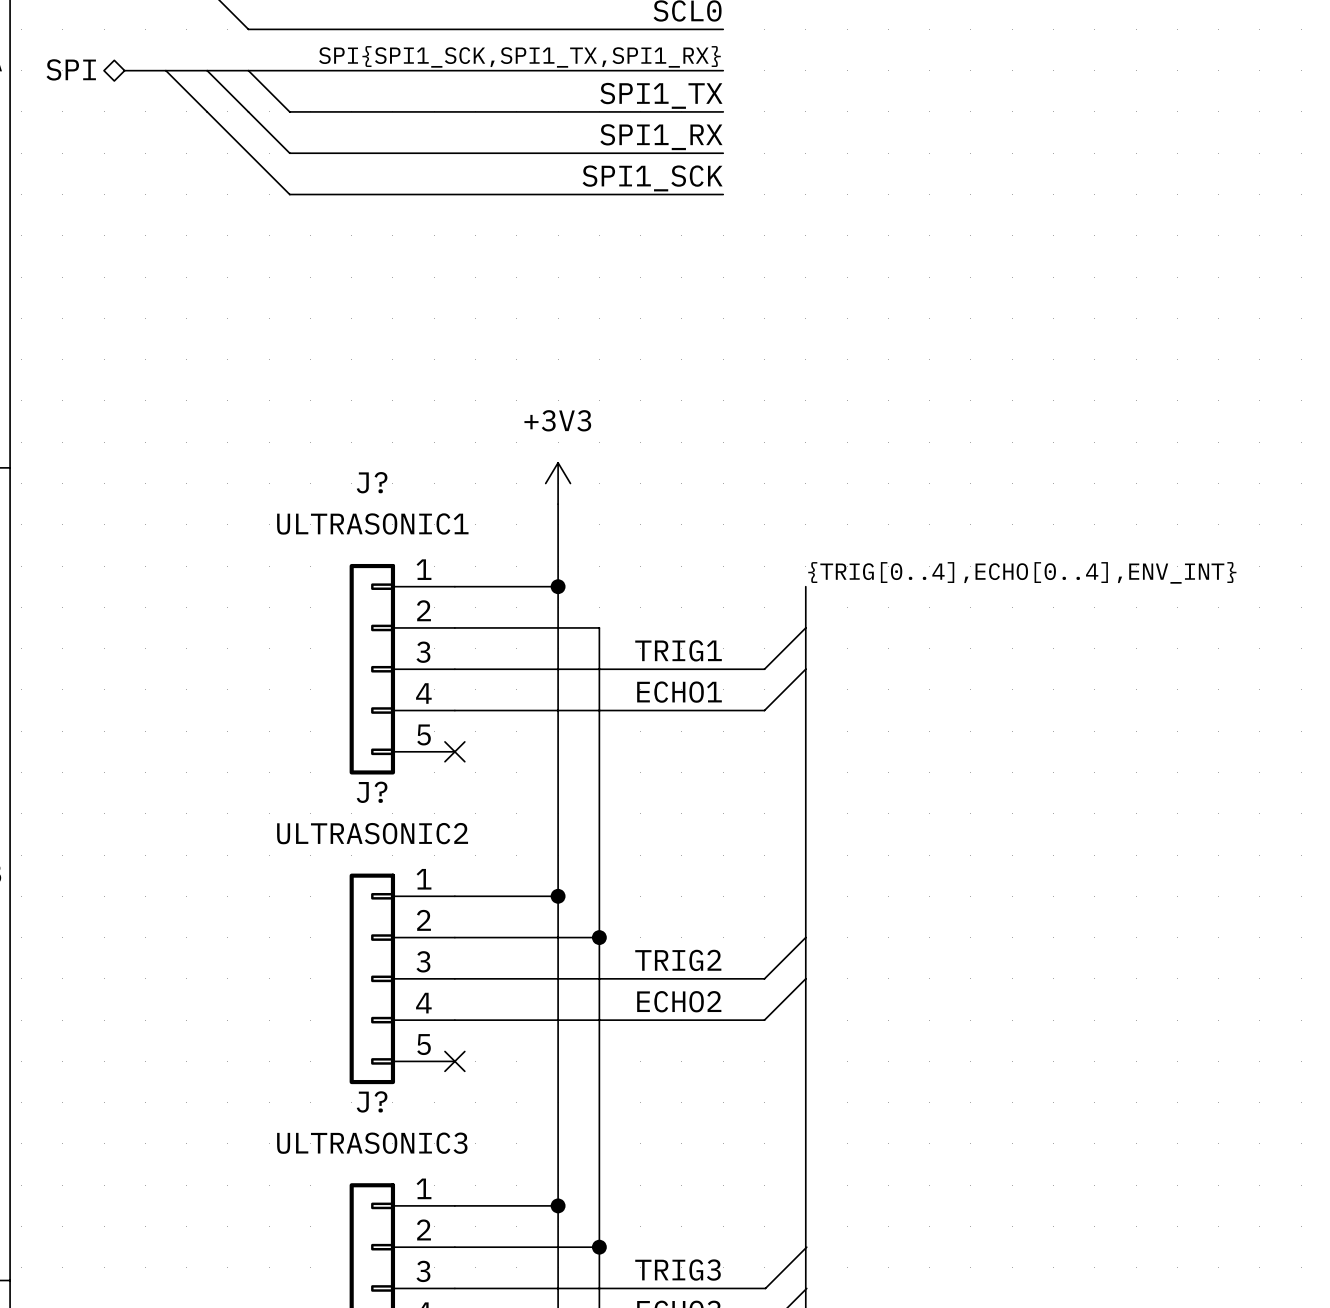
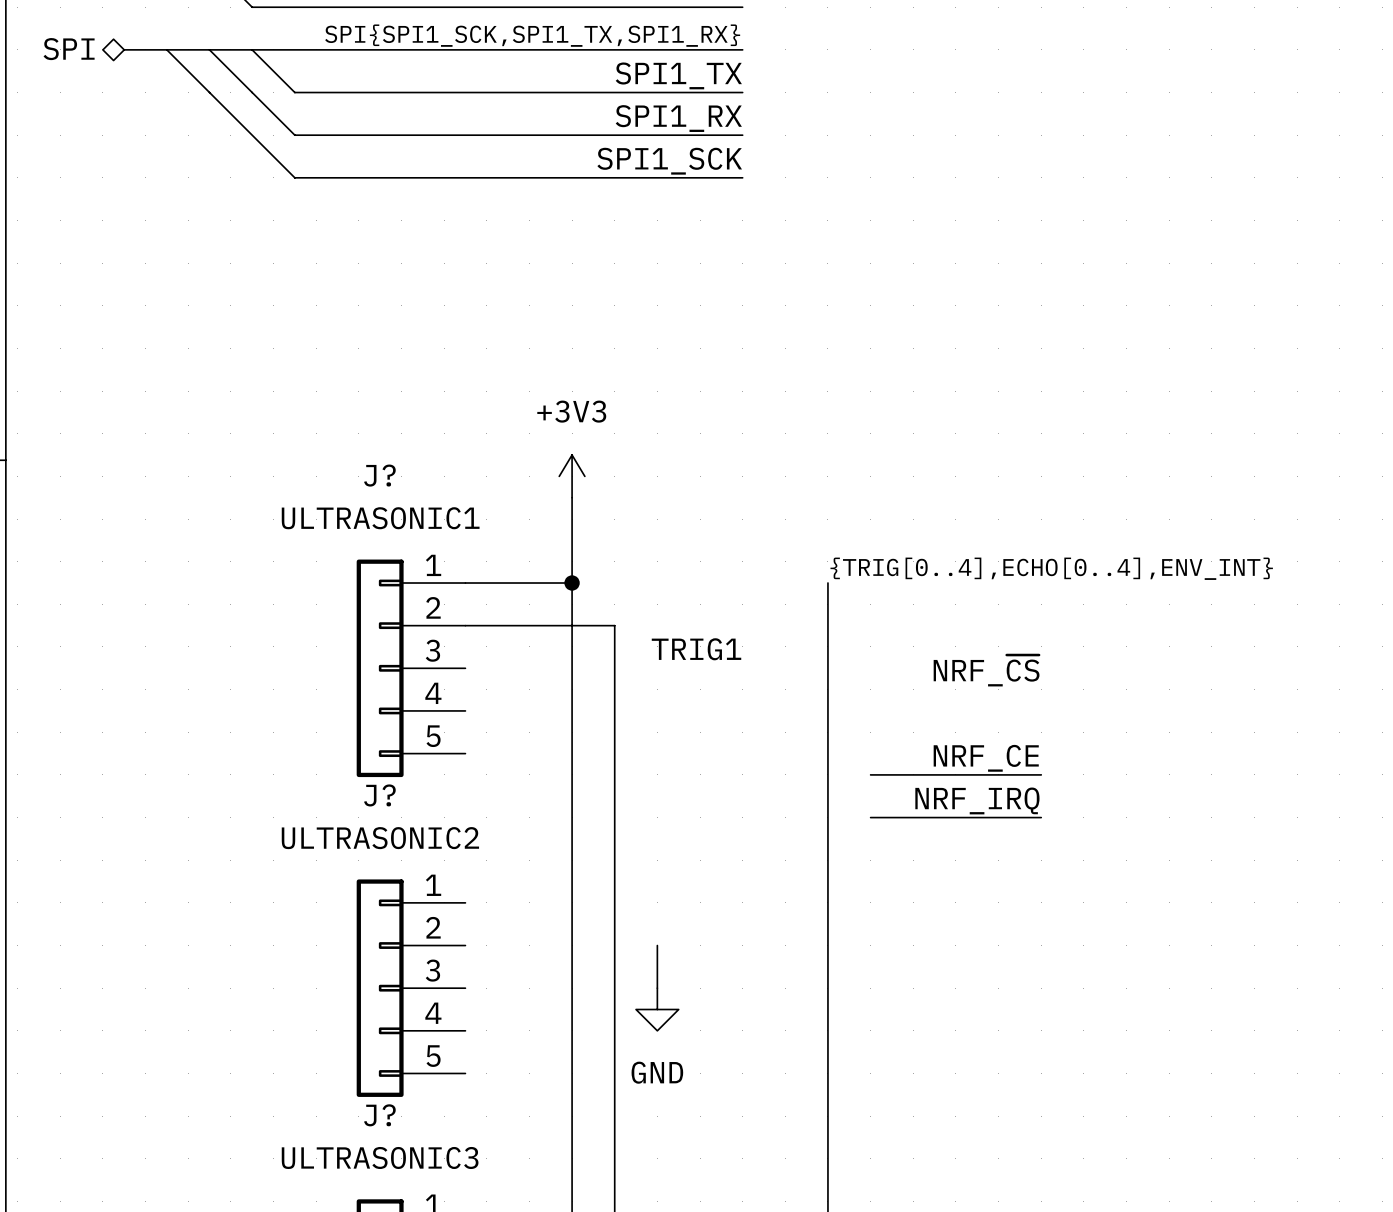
wire: (805, 627) (764, 669) (454, 669) -> none
wire: (805, 669) (764, 710) (454, 710) -> none
label: none -> NRF_~{CS} (986, 670)
label: ECHO1 (679, 692) -> none
no-connect mark: (454, 751) -> none
label: none -> NRF_CE (986, 758)
wire: none -> (870, 774) (1041, 774)
label: none -> NRF_IRQ (977, 800)
wire: none -> (870, 817) (1041, 817)
wire: (454, 896) (558, 896) -> none
junction: (558, 896) -> none
wire: (454, 937) (599, 937) -> none
junction: (599, 937) -> none
wire: none -> (657, 945) (657, 988)
wire: (805, 937) (764, 978) (454, 978) -> none
label: TRIG2 (678, 960) -> none
wire: (805, 978) (764, 1020) (454, 1020) -> none
power symbol: none -> GND (657, 1009)
label: ECHO2 (679, 1001) -> none
no-connect mark: (454, 1061) -> none

